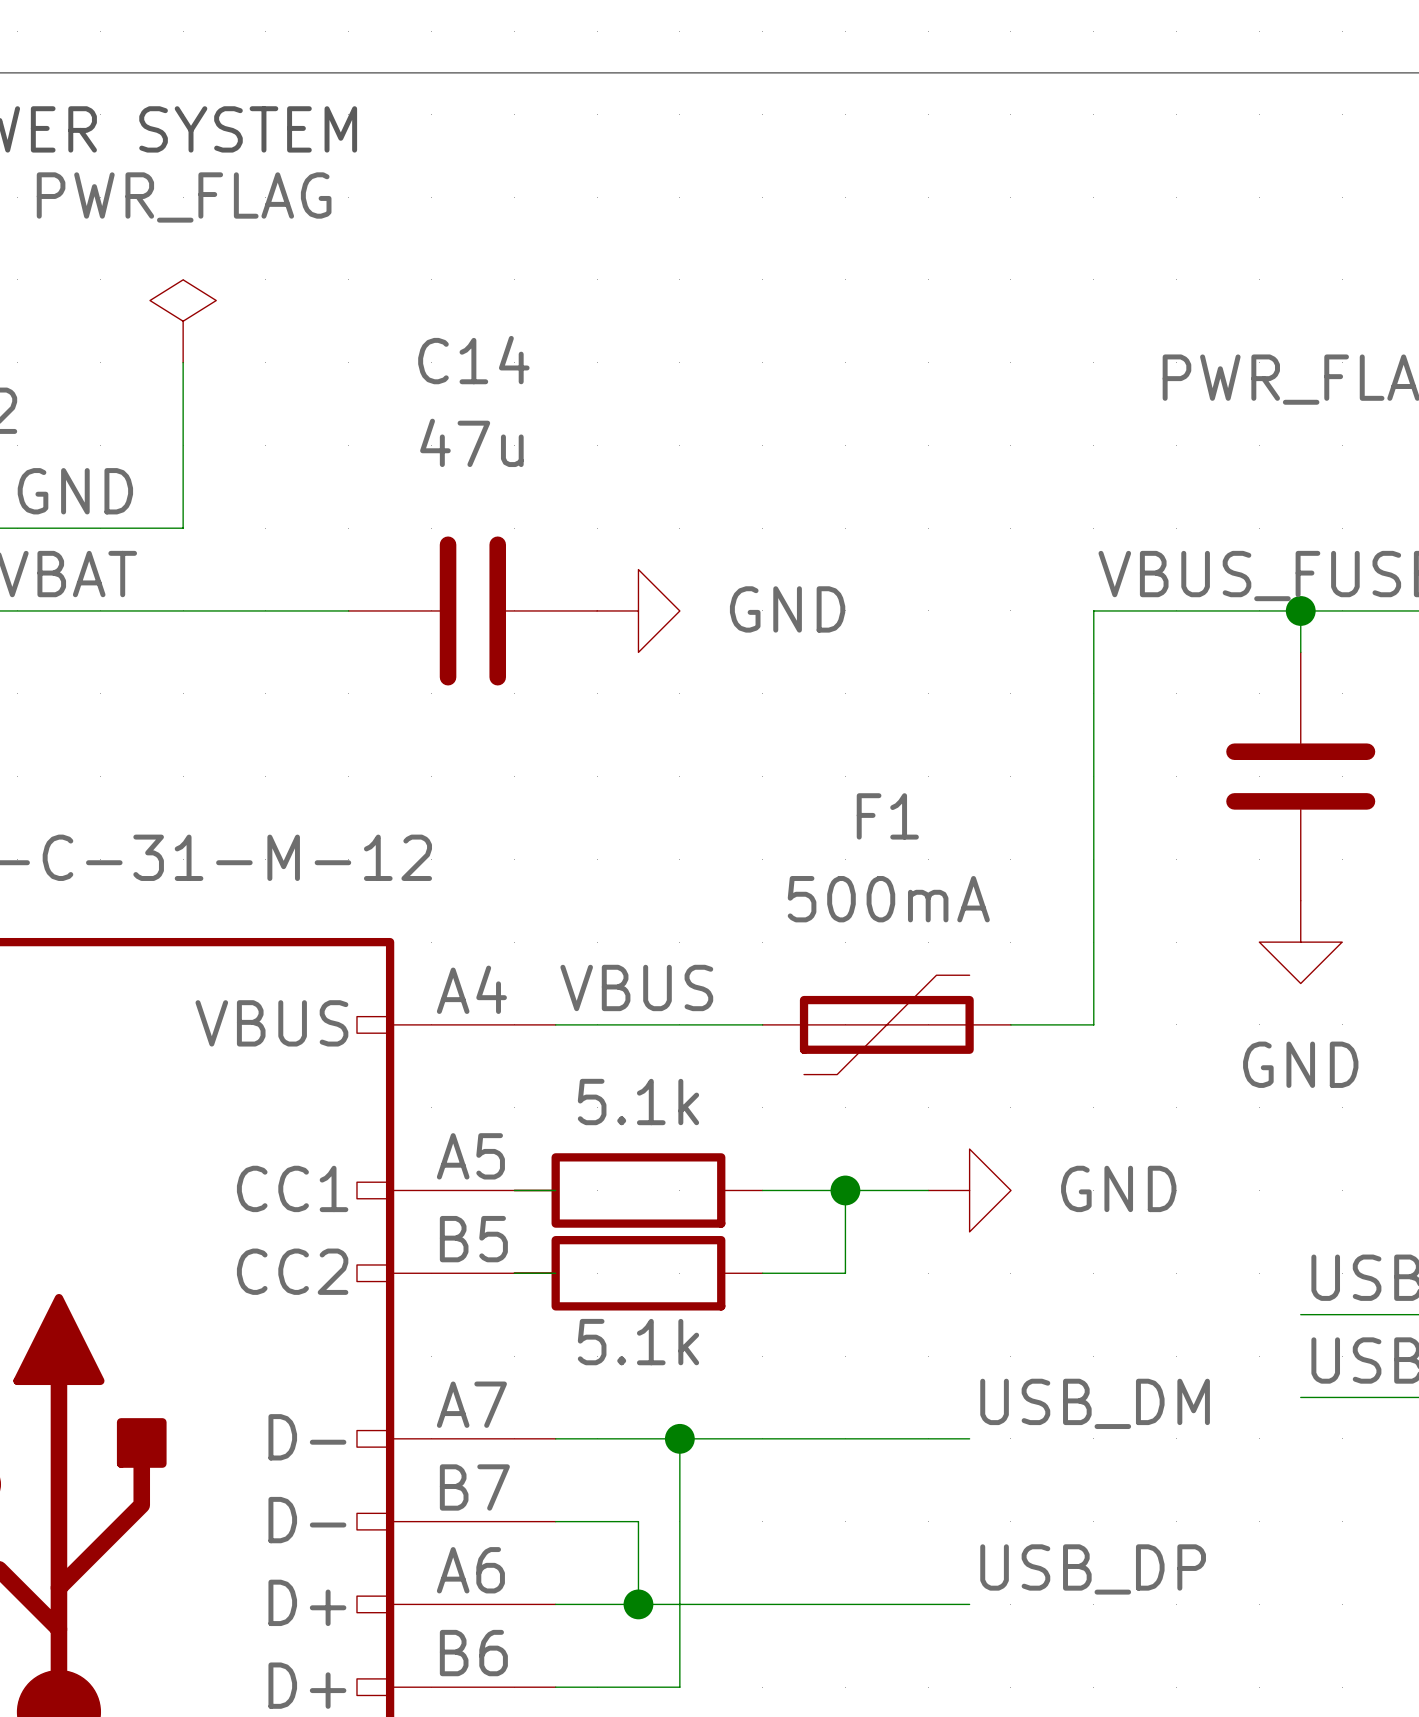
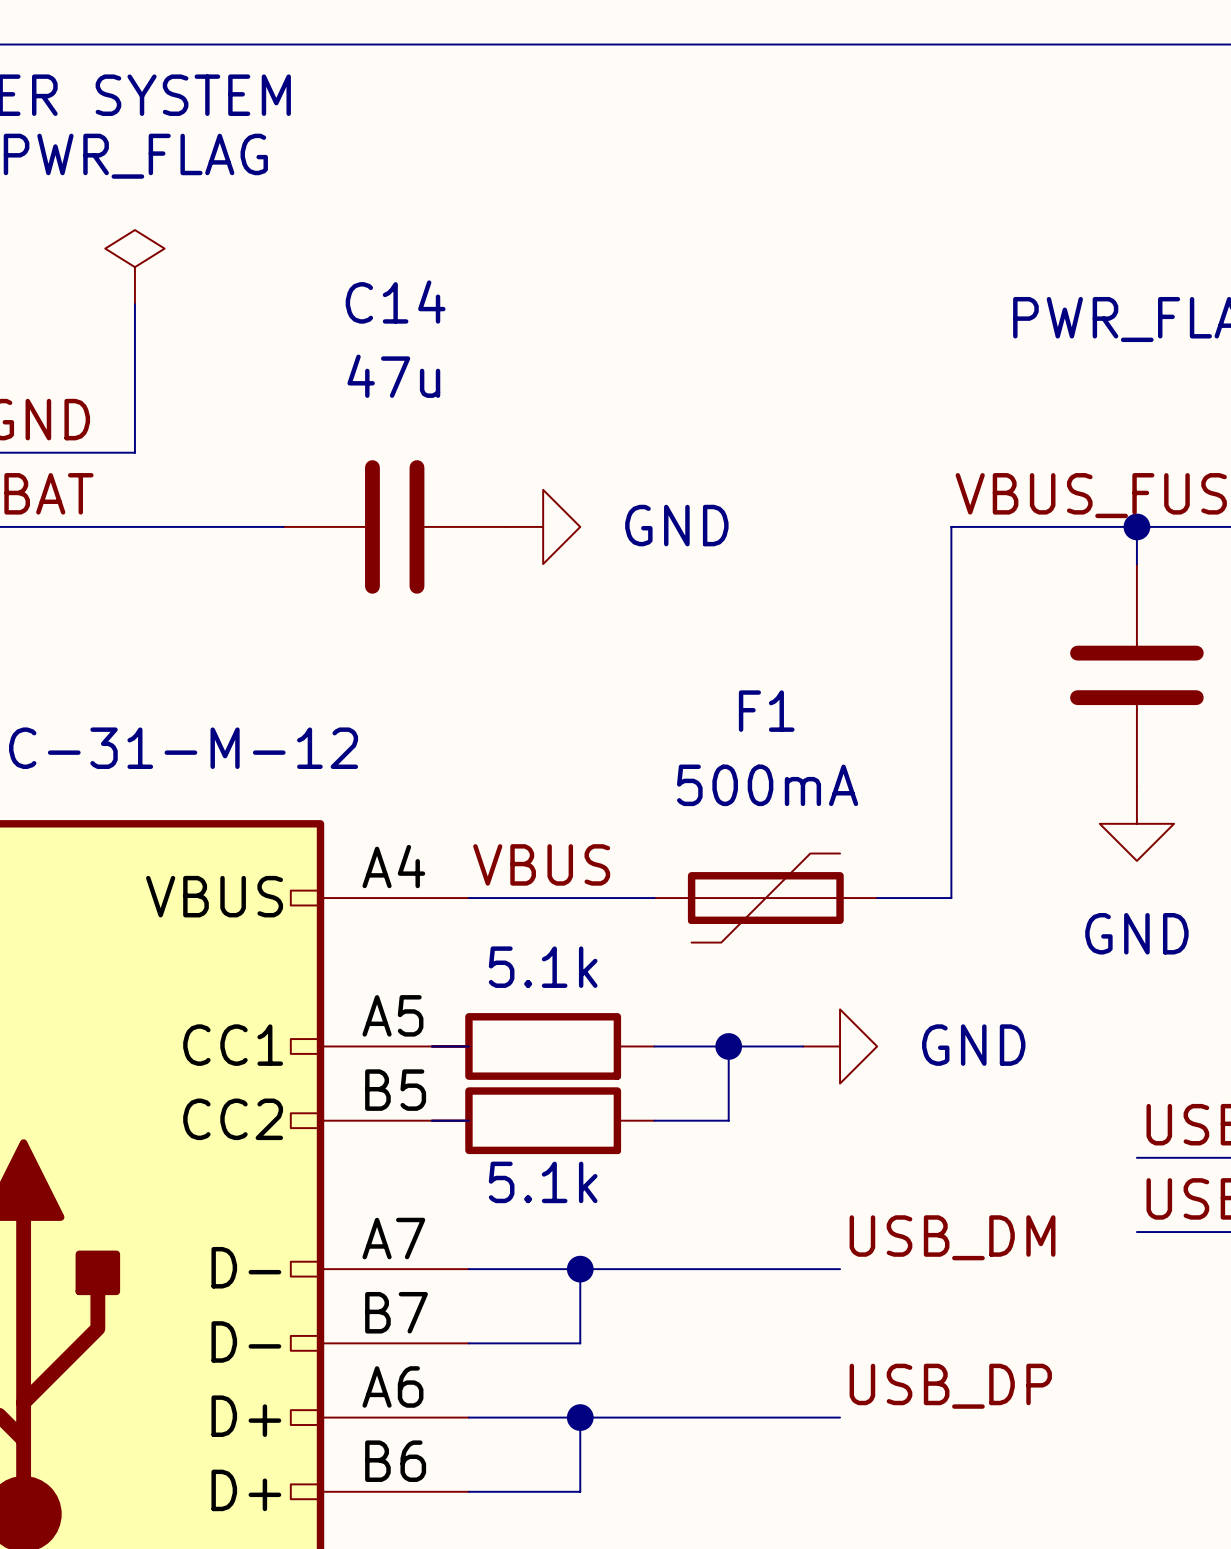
wire: (638, 1521) (638, 1604) -> (543, 1343) (580, 1343)
wire: (679, 1521) (679, 1604) -> none
junction position: (638, 1604) -> (580, 1417)

